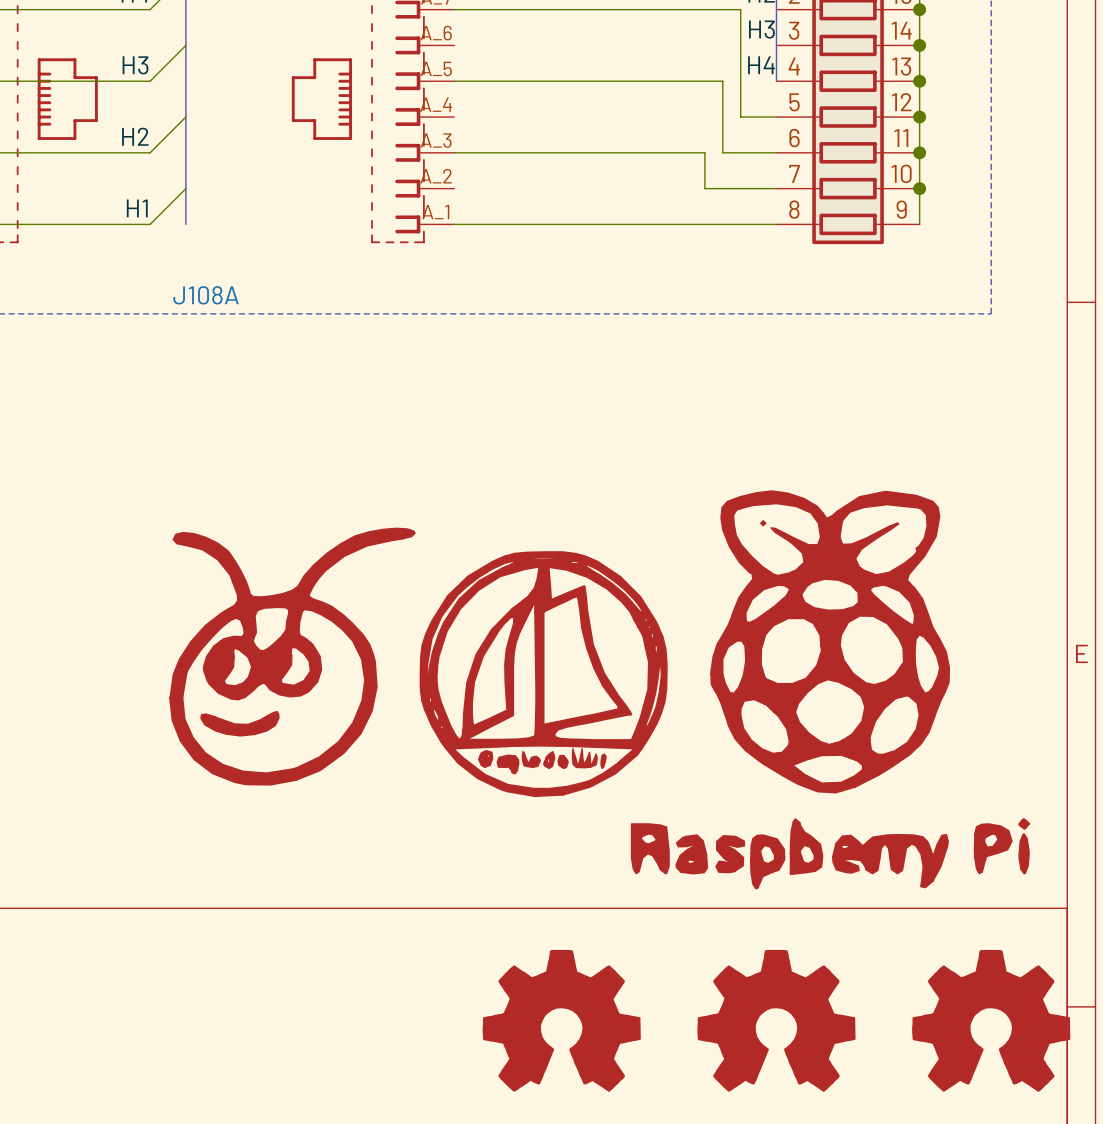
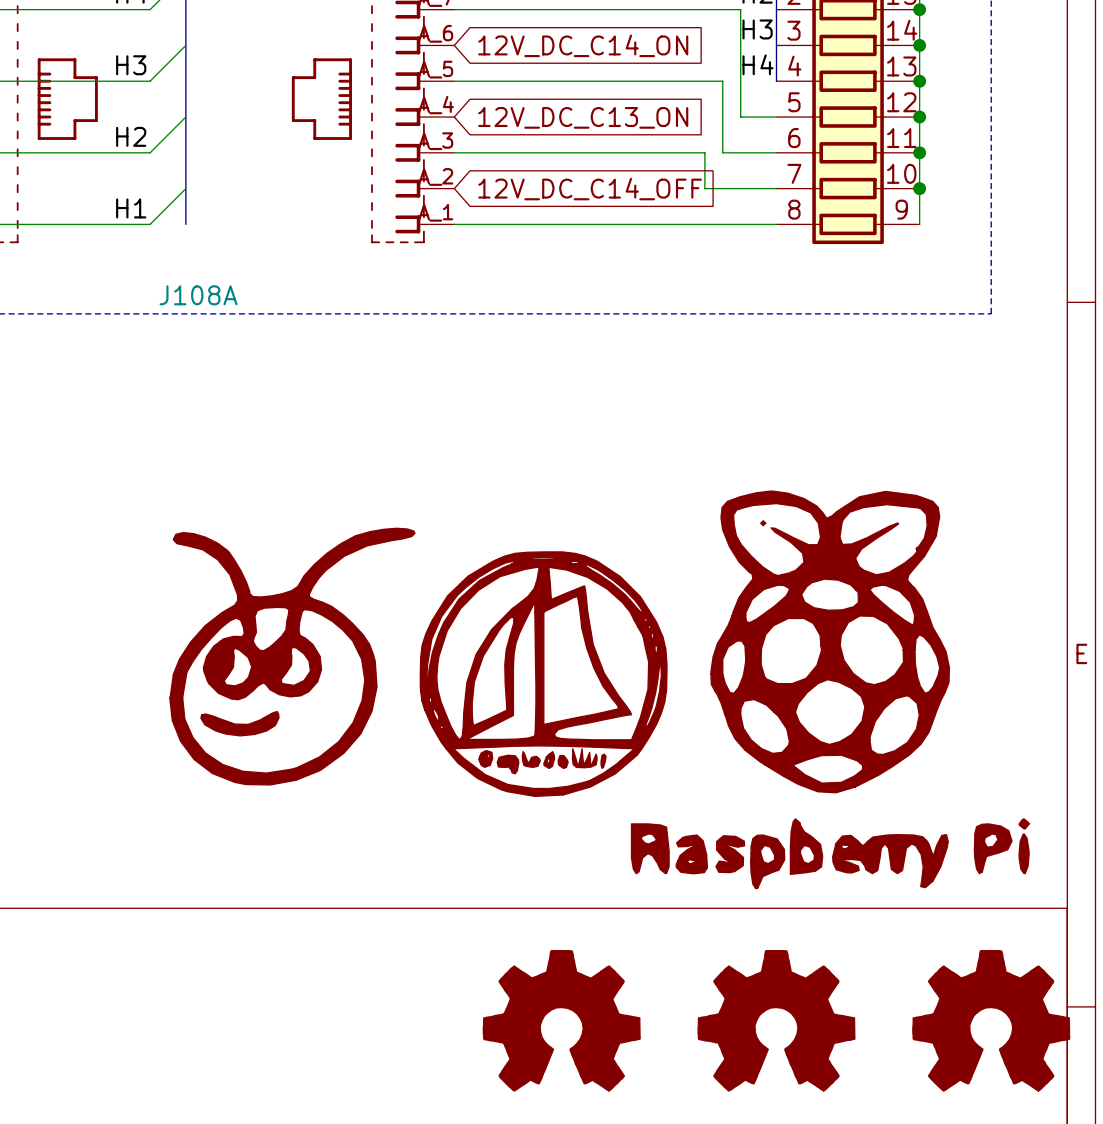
global label: none -> 12V_DC_C14_ON (583, 45)
global label: none -> 12V_DC_C13_ON (583, 117)
global label: none -> 12V_DC_C14_OFF (590, 189)

